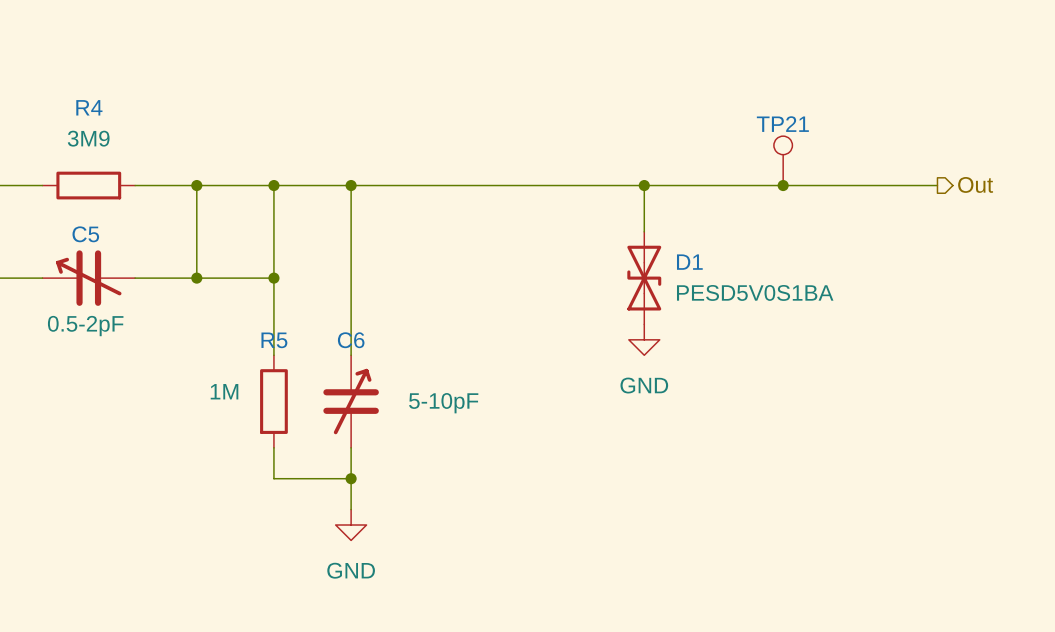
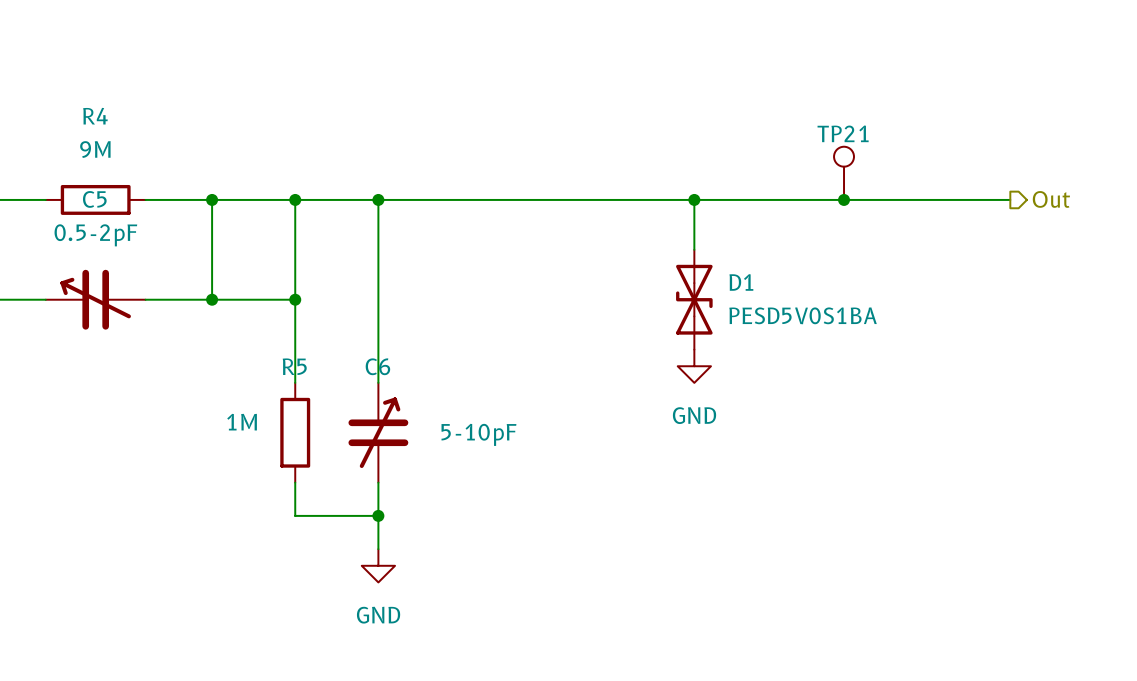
R4 value: 3M9 (88, 138) -> 9M (95, 149)
C5 name position: C5 (85, 234) -> C5 (94, 199)
C5 value position: 0.5-2pF (85, 326) -> 0.5-2pF (95, 235)

